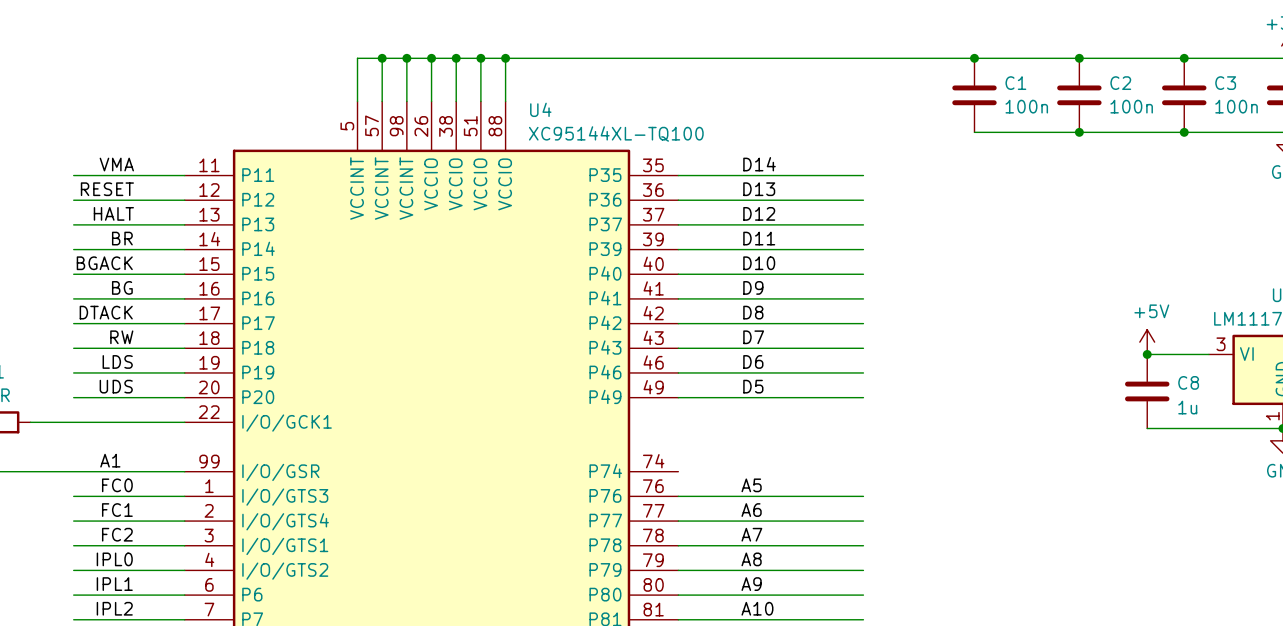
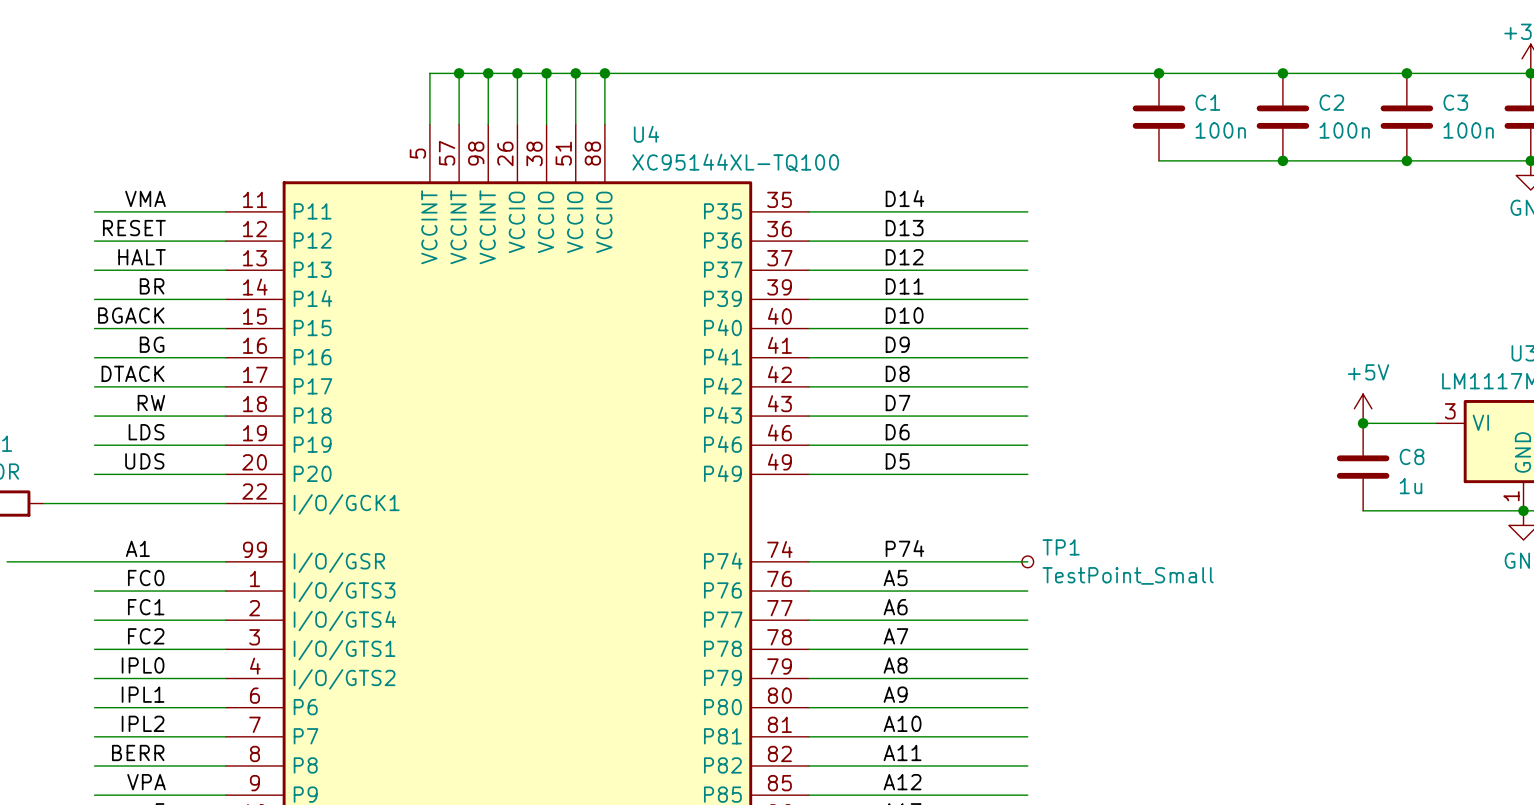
label: none -> P74 (904, 548)
wire: none -> (809, 561) (1027, 561)
TP1: none -> TestPoint_Small (1027, 561)

